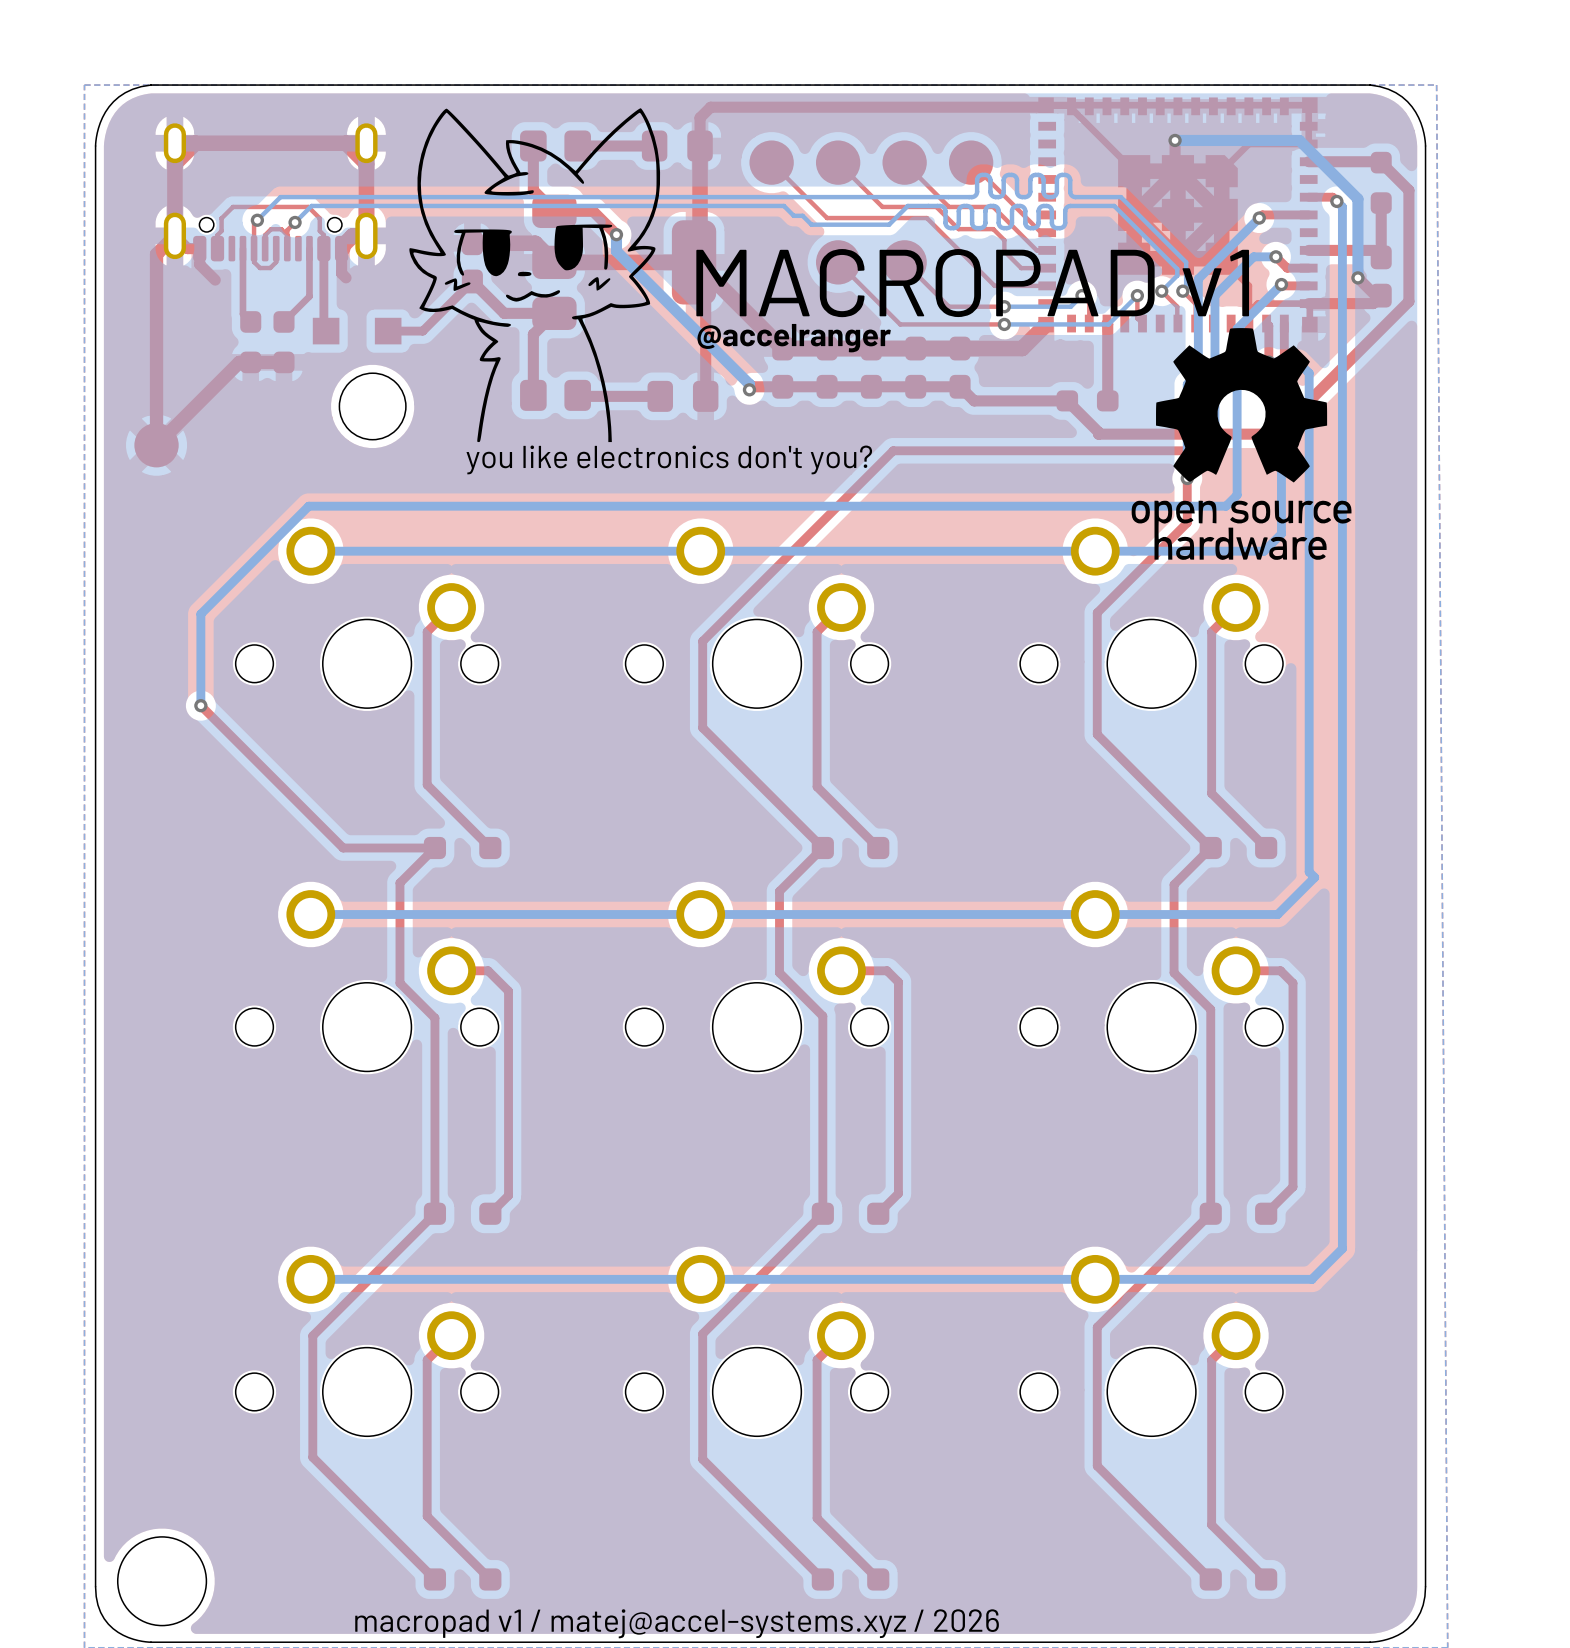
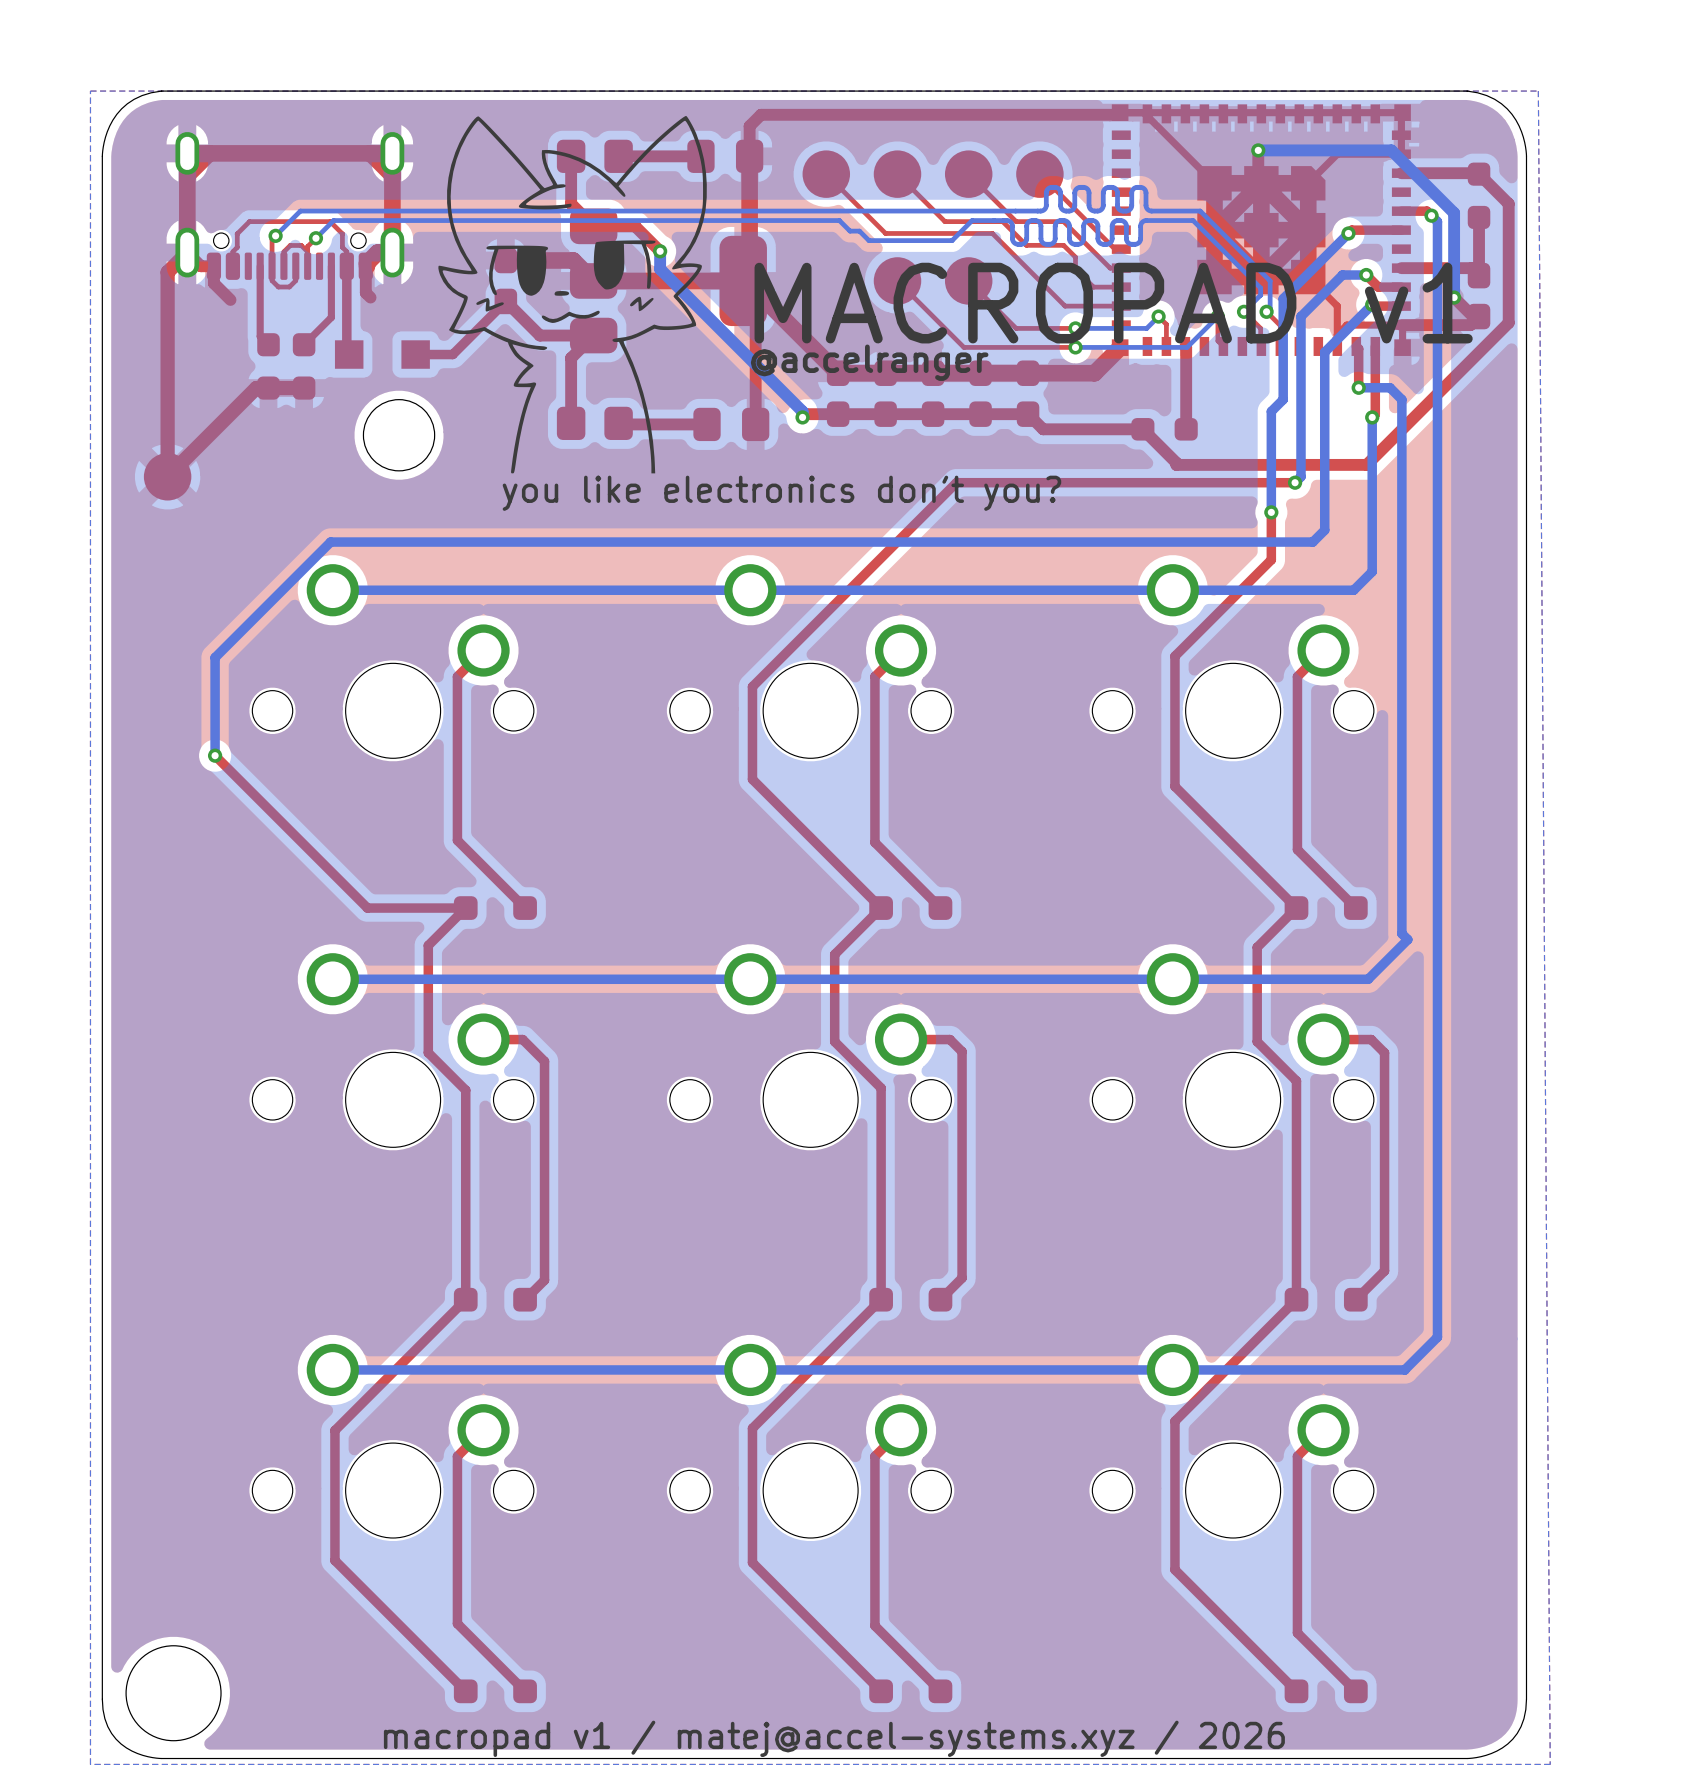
drawing: [1131, 328, 1352, 560] -> none

